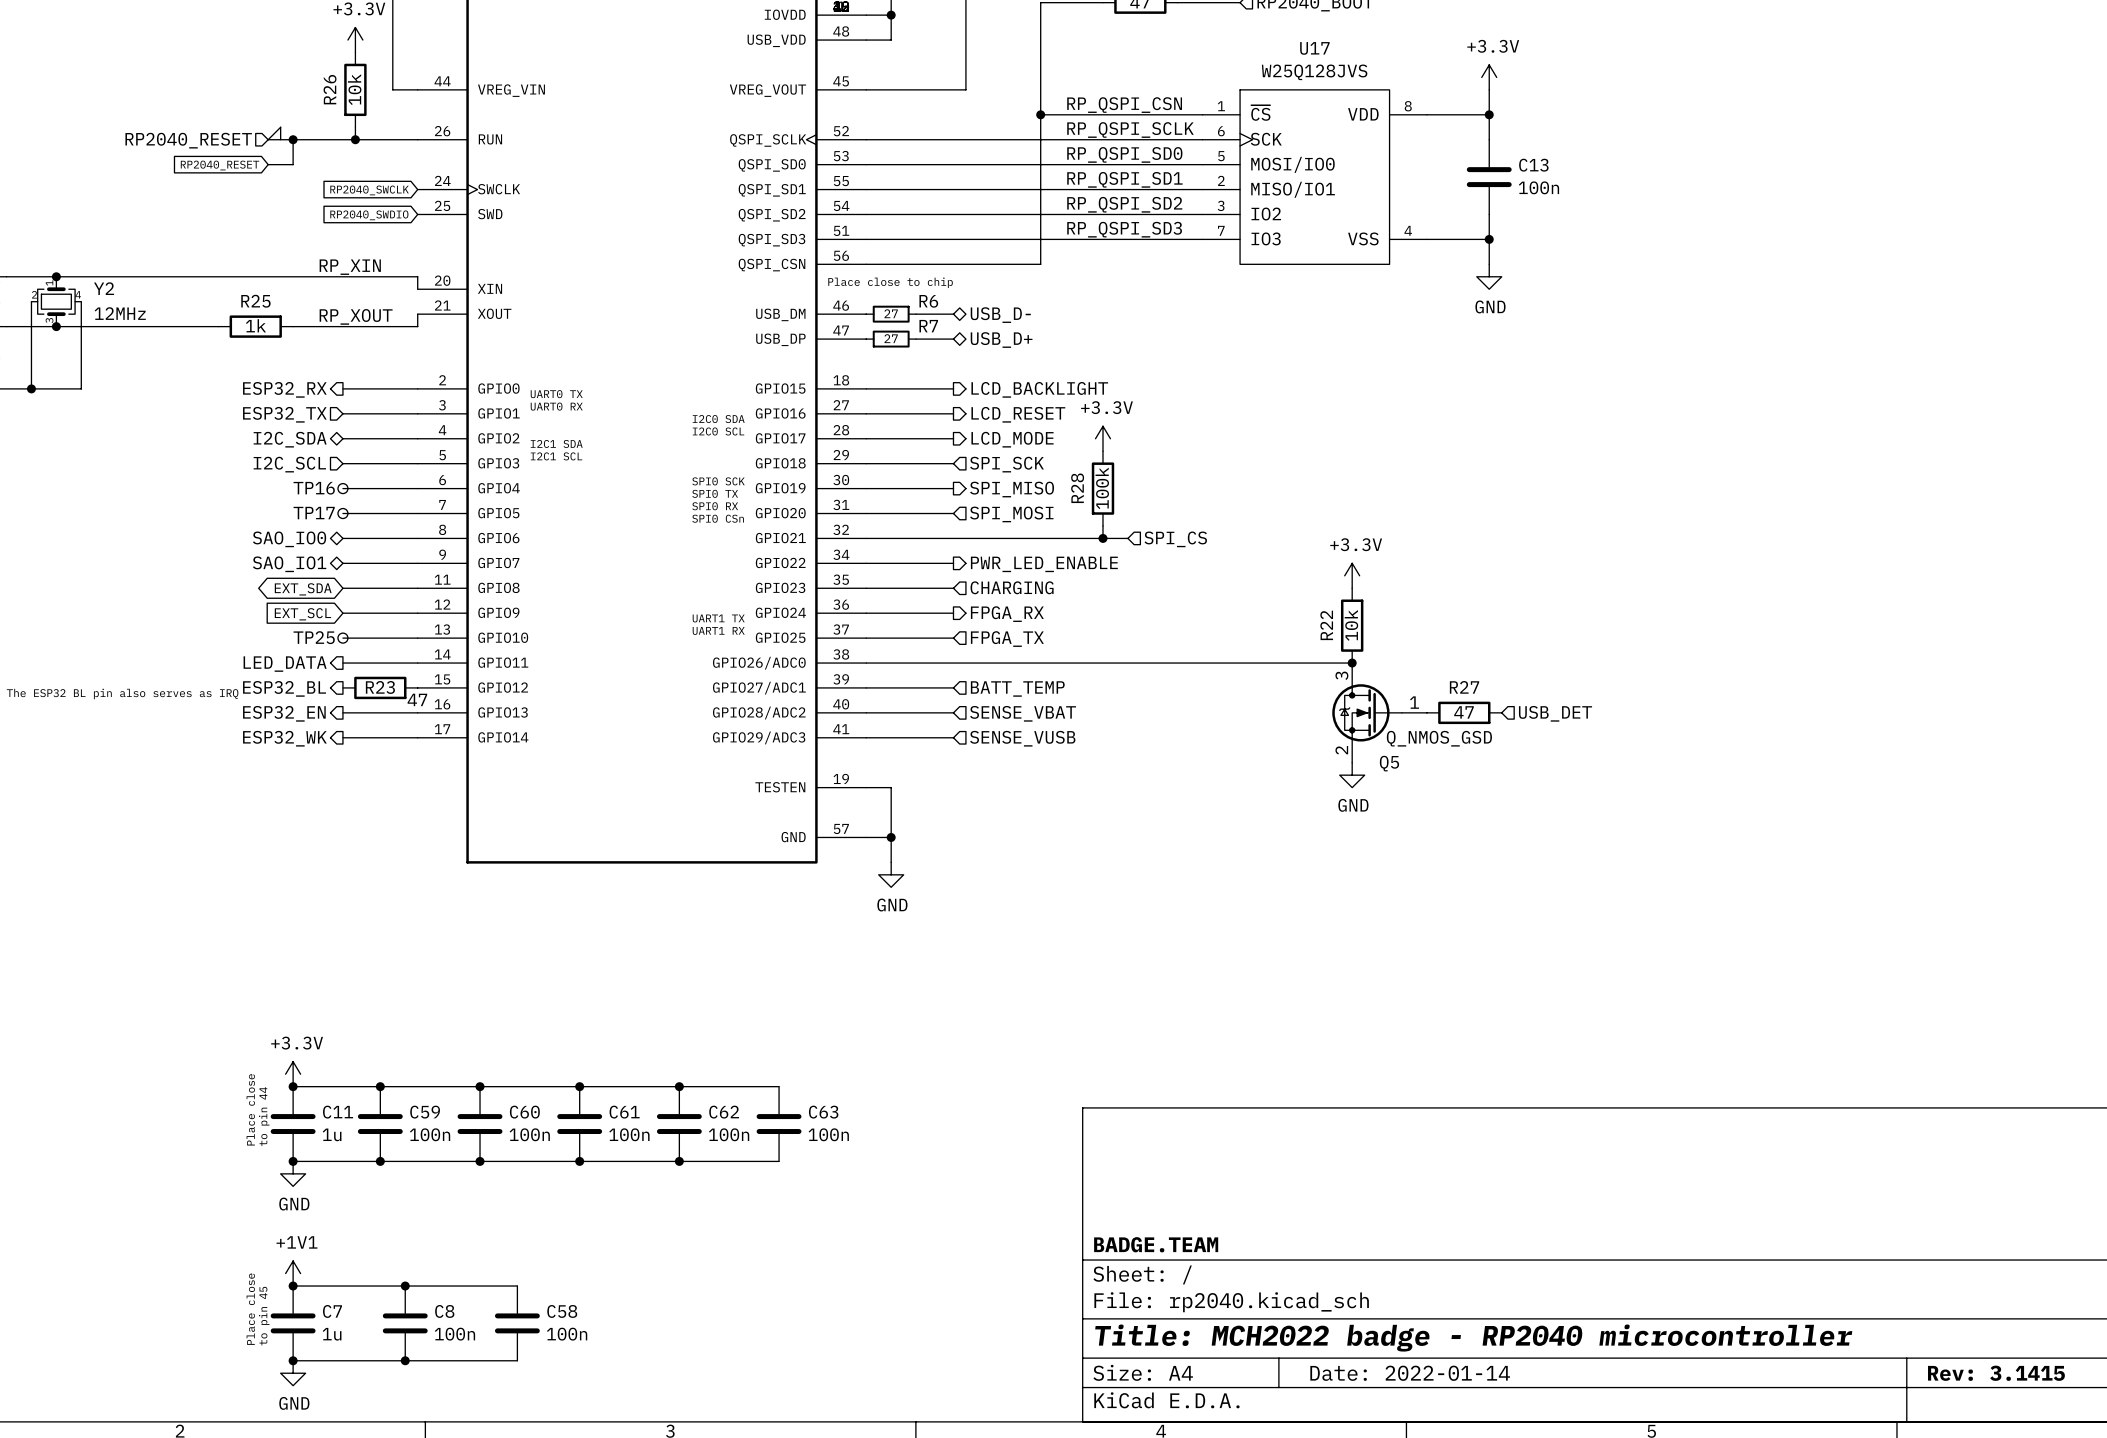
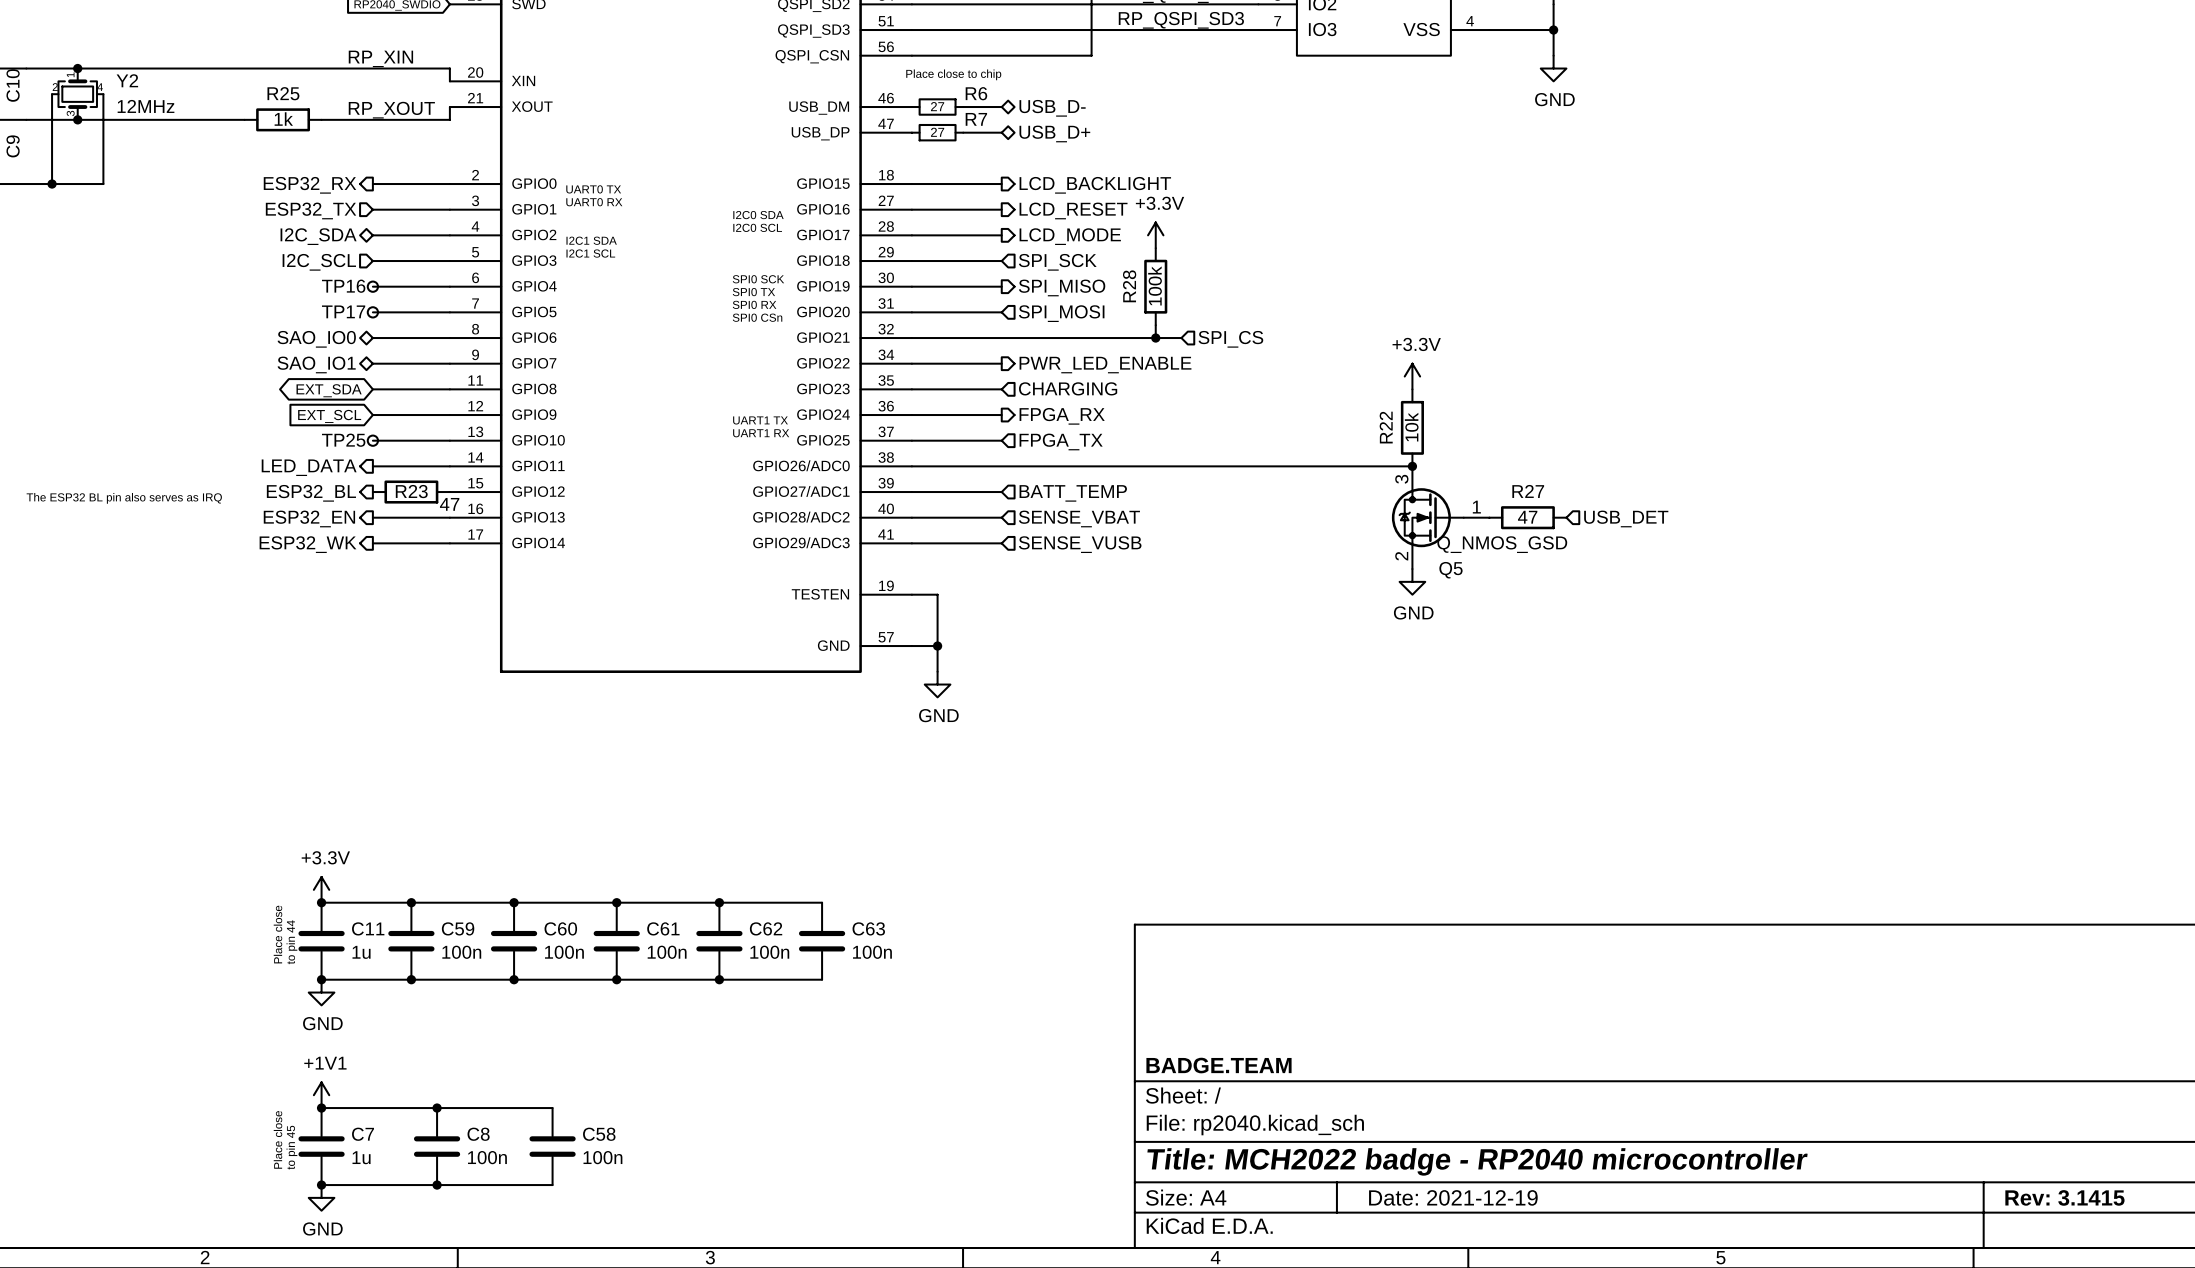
title block: Date: 2022-01-14 (1410, 1373) -> Date: 2021-12-19 (1453, 1197)

